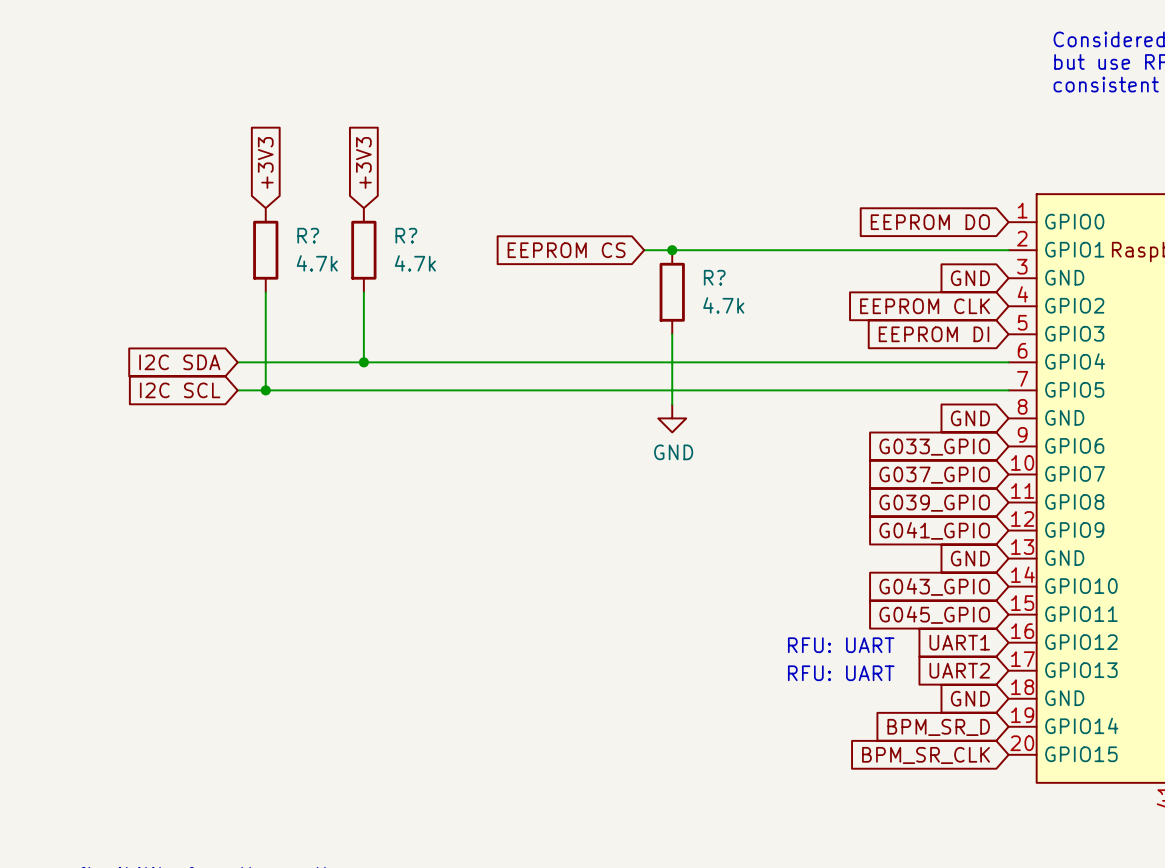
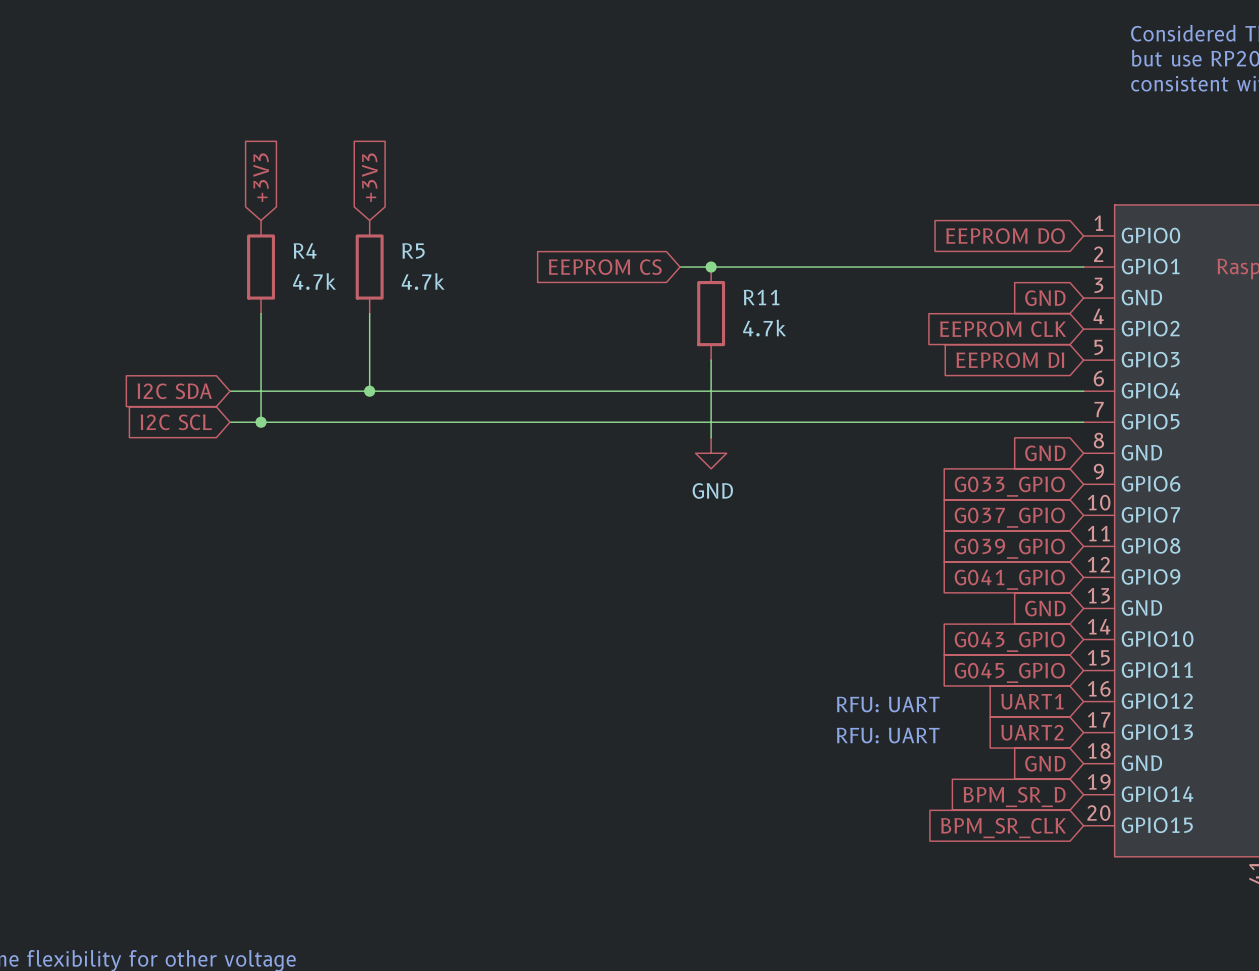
R? name: R? (308, 235) -> R4 (305, 250)
R? name: R? (406, 235) -> R5 (413, 250)
R? name: R? (714, 277) -> R11 (761, 297)

